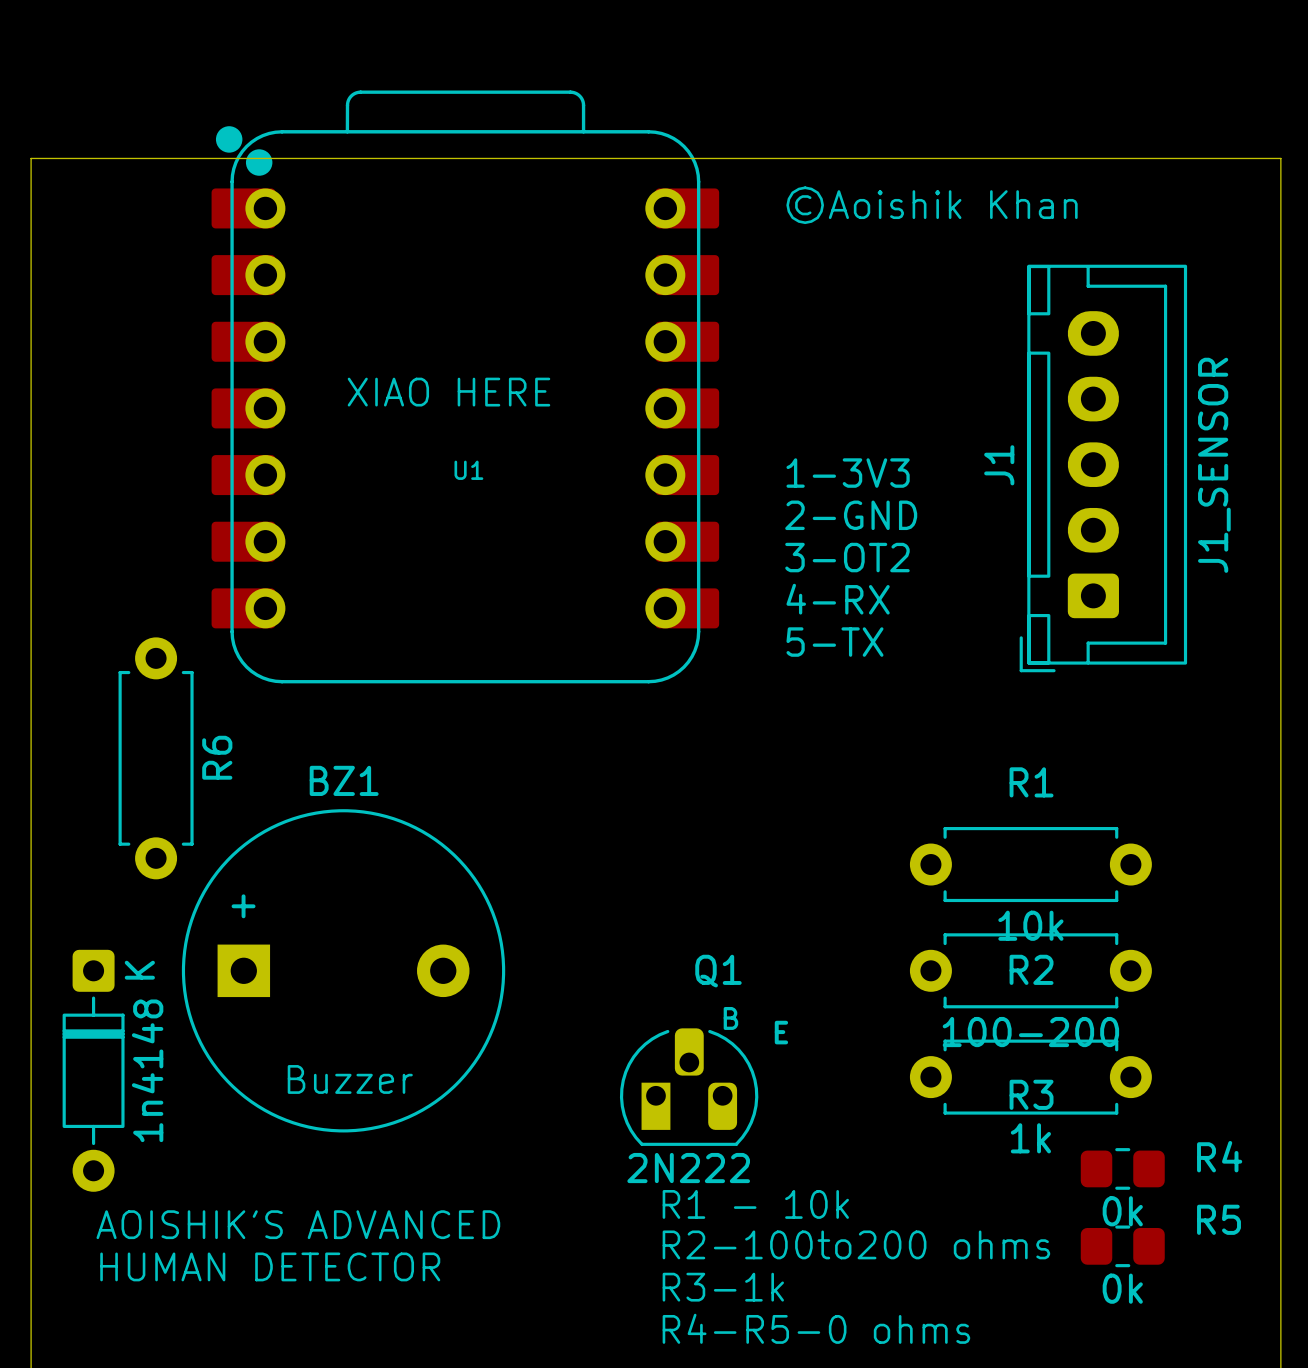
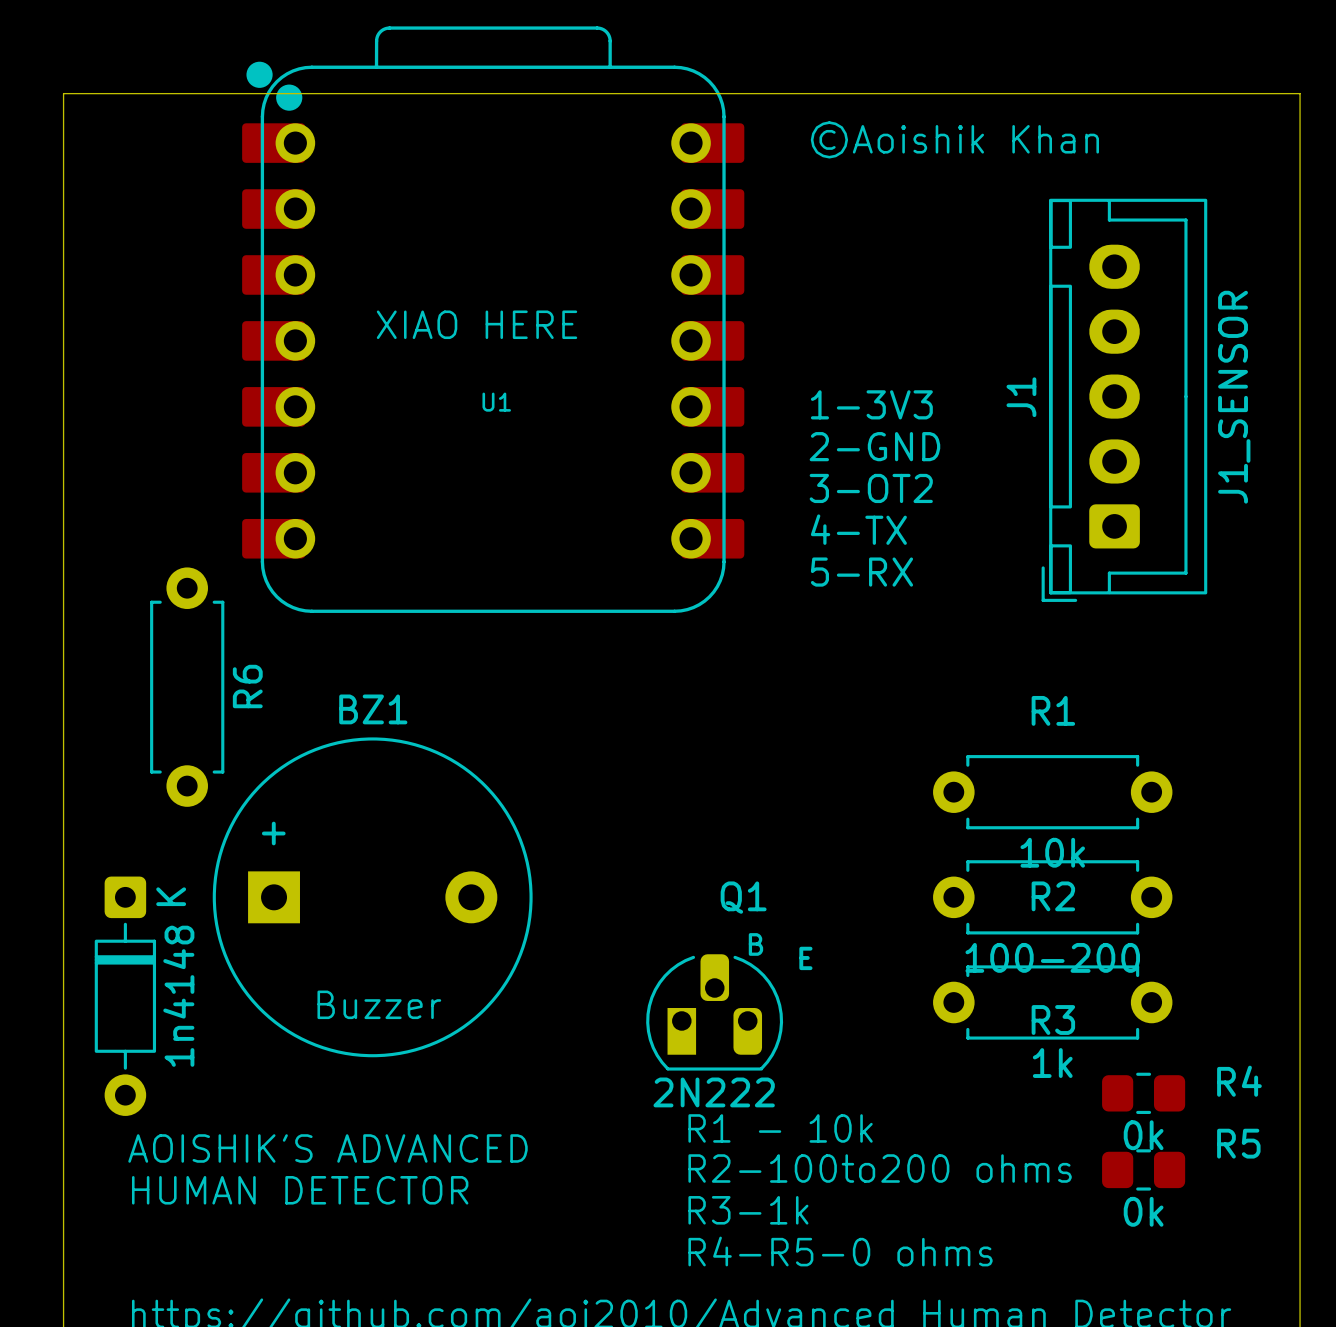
text: 4-RX (838, 599) -> 4-TX (858, 529)
text: 5-TX (834, 642) -> 5-RX (861, 572)

